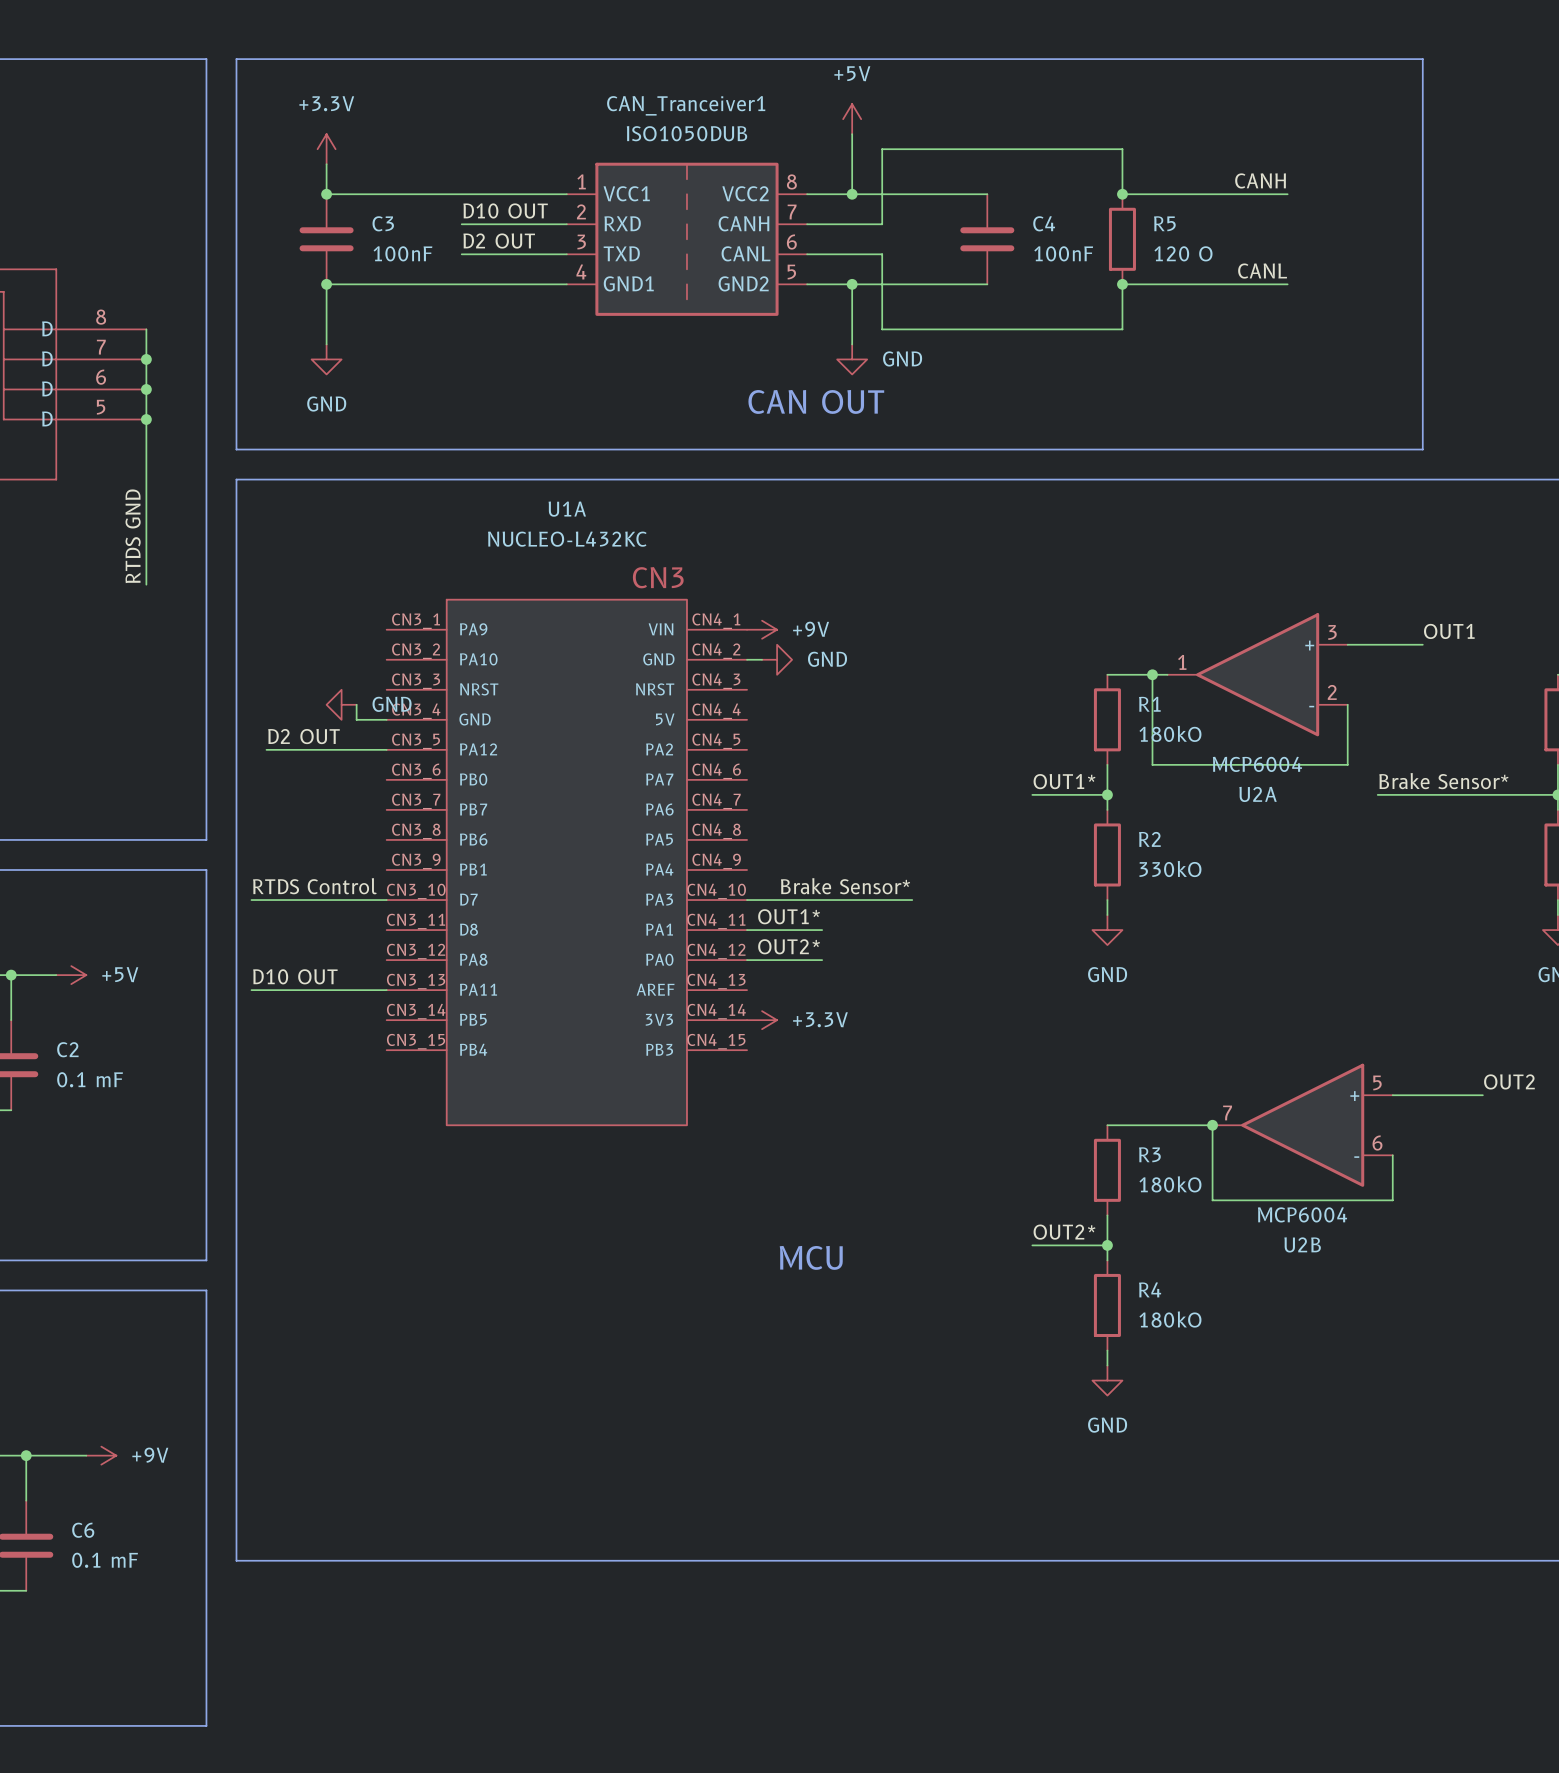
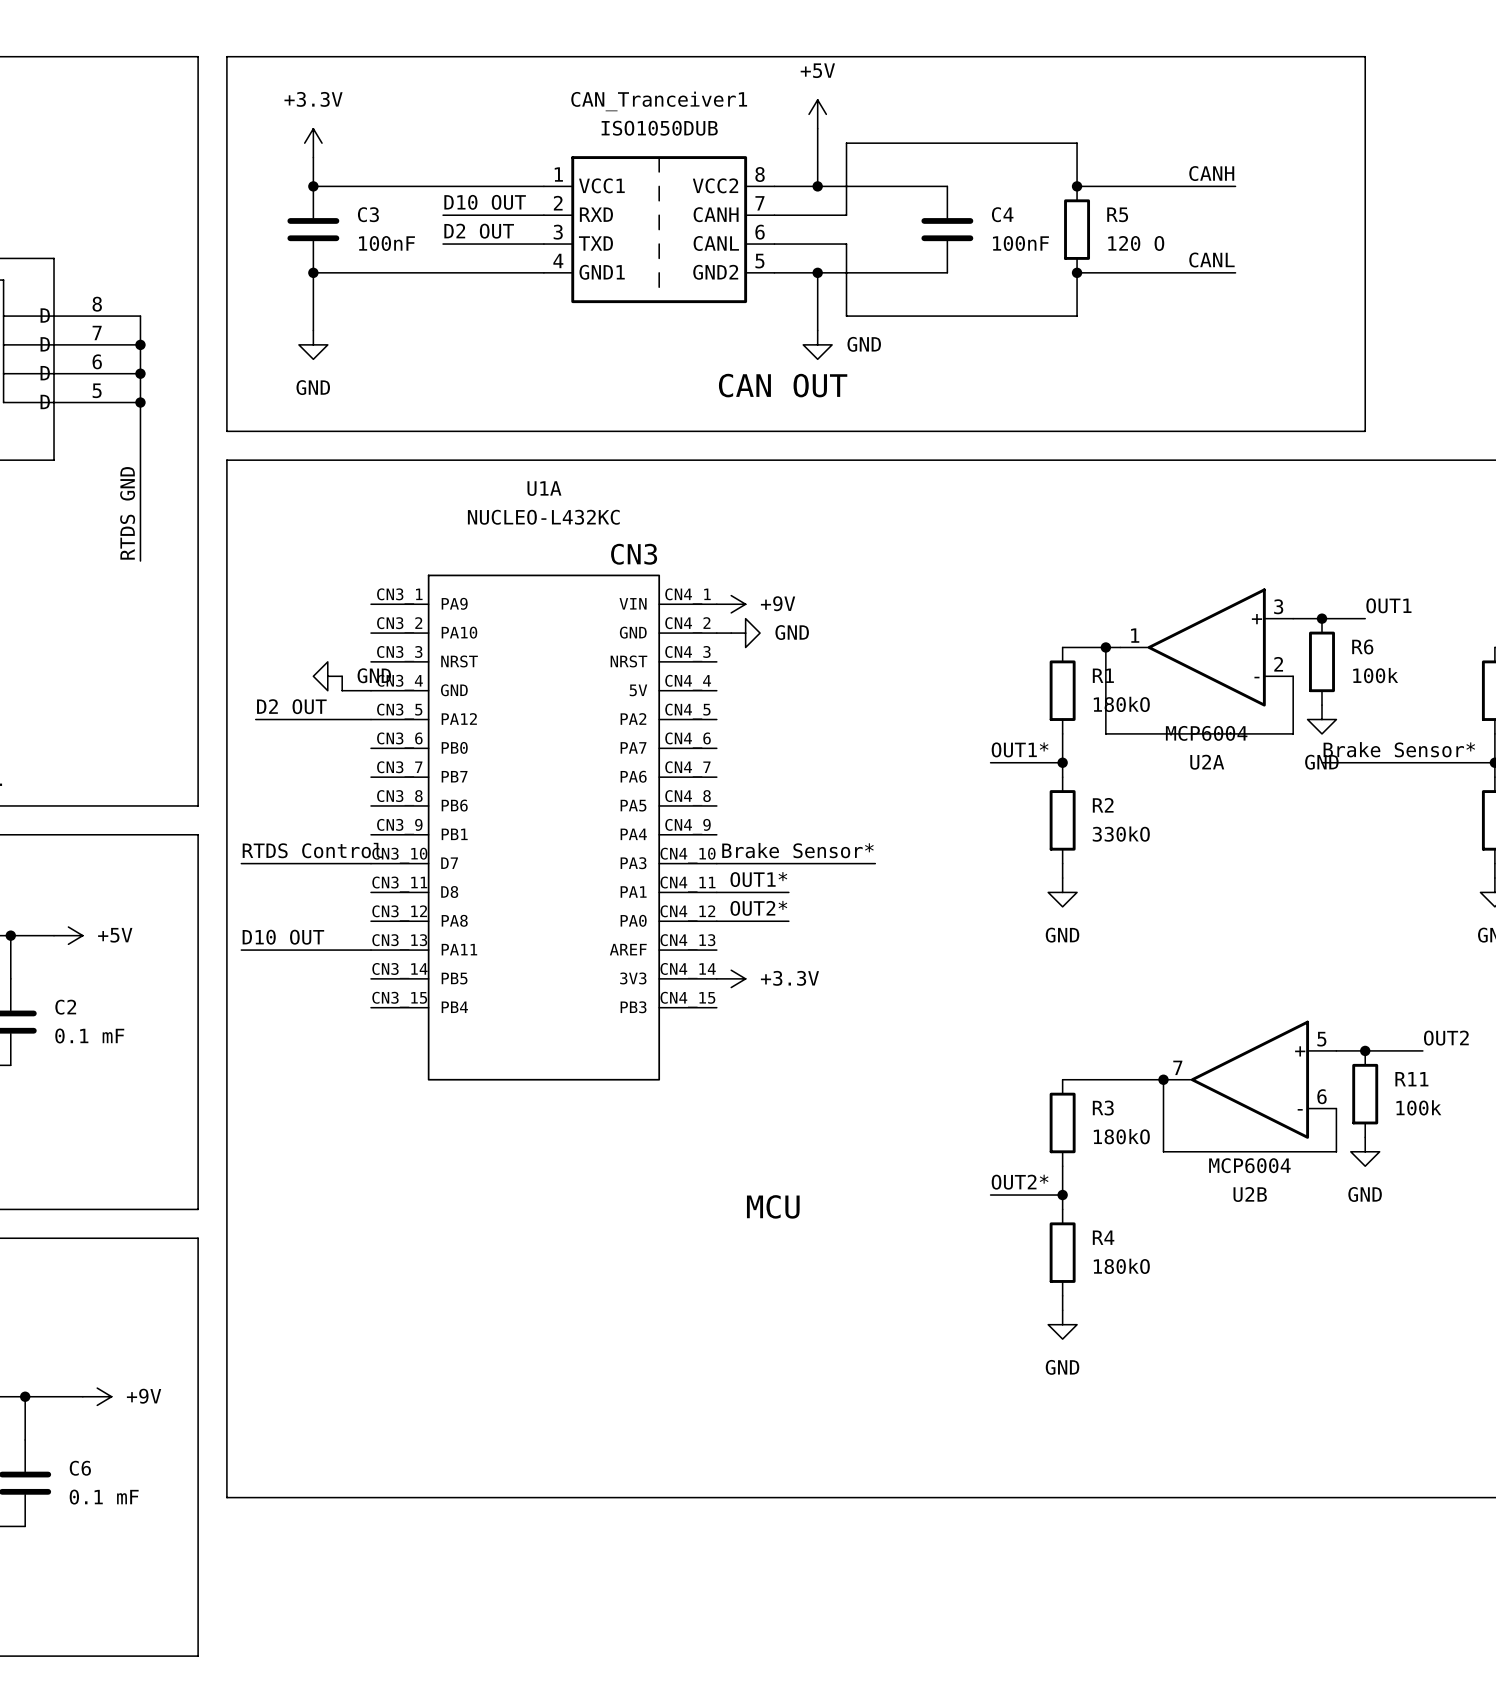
junction: none -> (1321, 618)
R6: none -> 100k (1321, 661)
power symbol: none -> GND (1321, 719)
junction: none -> (1365, 1050)
R11: none -> 100k (1365, 1094)
power symbol: none -> GND (1365, 1151)

